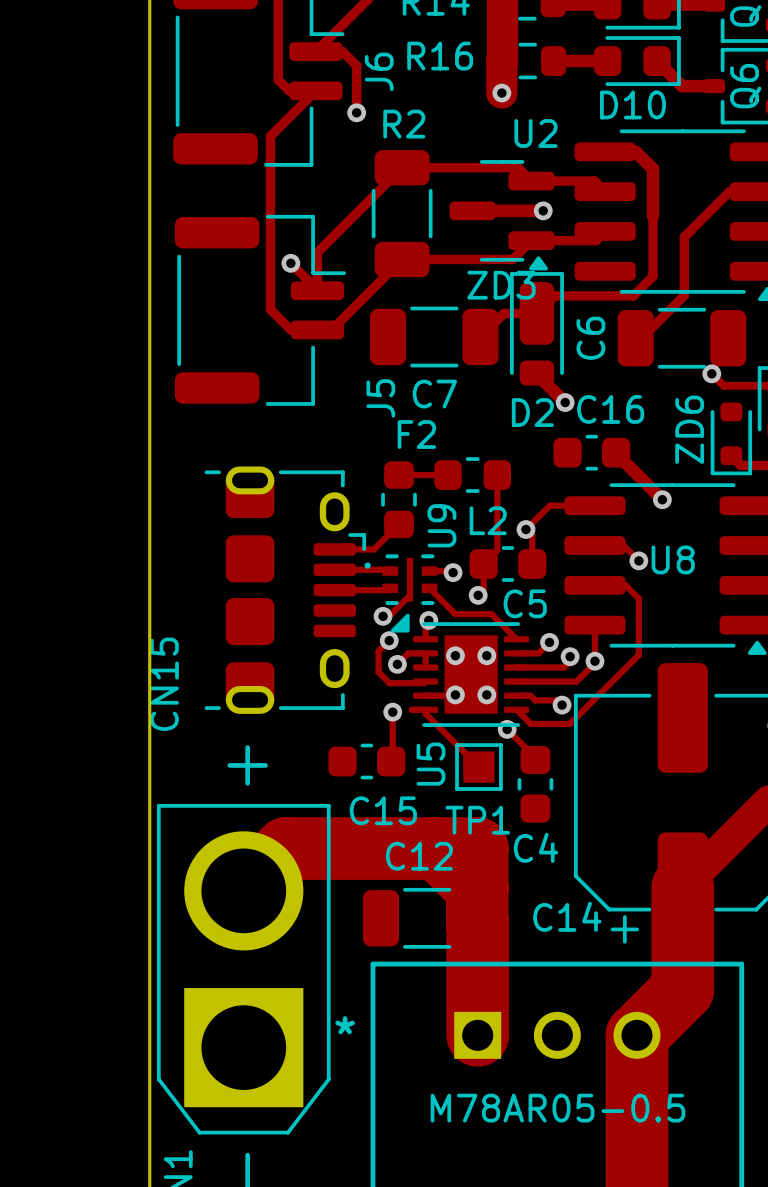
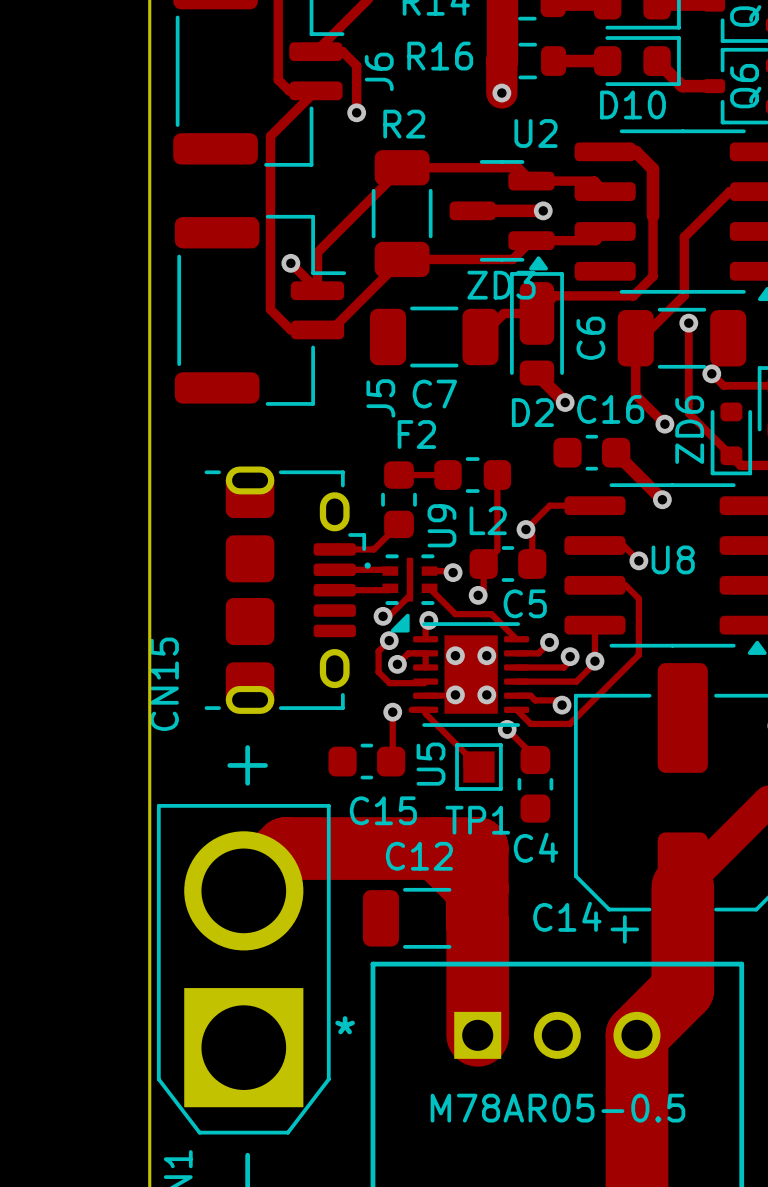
track: none -> (688, 323) (688, 413) (731, 455)
via: none -> (688, 323)
track: none -> (635, 347) (635, 395) (664, 424)
via: none -> (664, 424)

